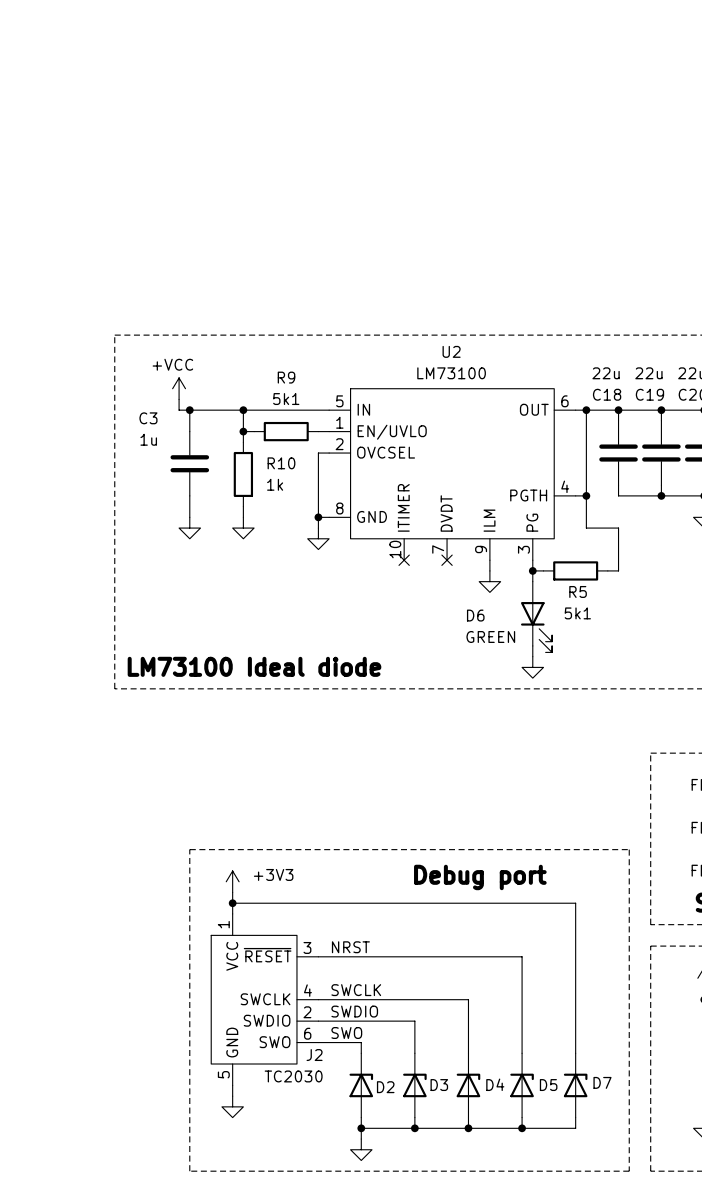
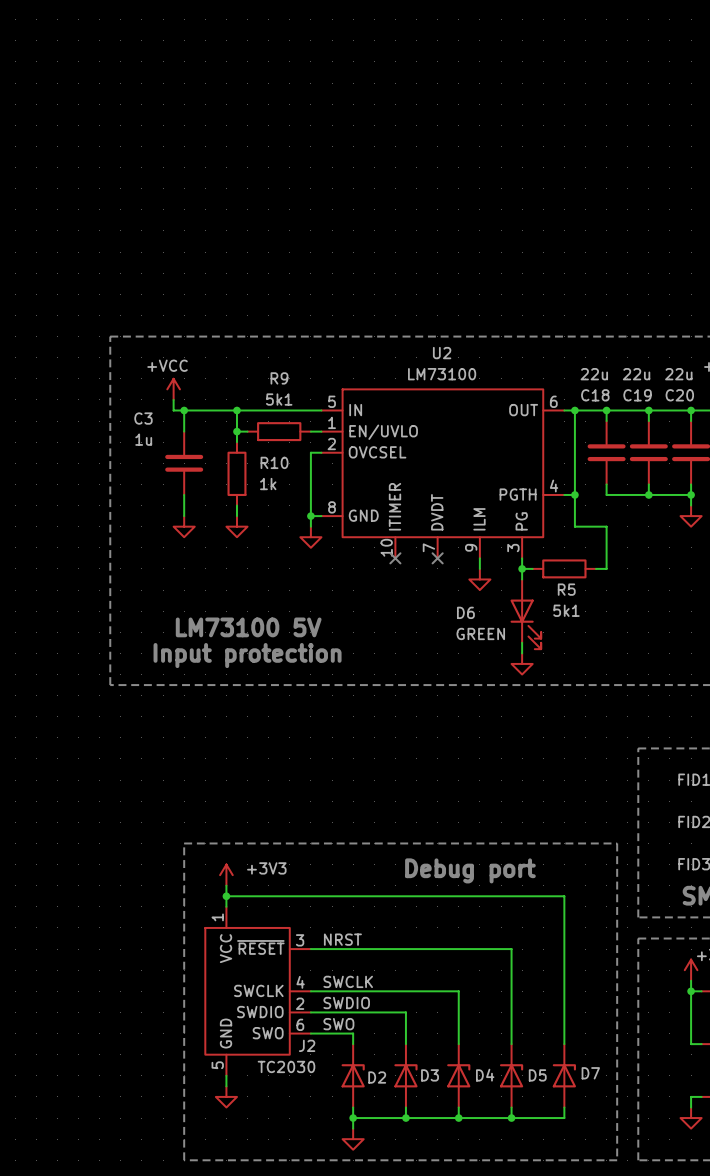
text: none -> LM73100 5V (248, 627)
text: none -> Input protection (247, 655)
text: LM73100 Ideal diode (254, 666) -> none

